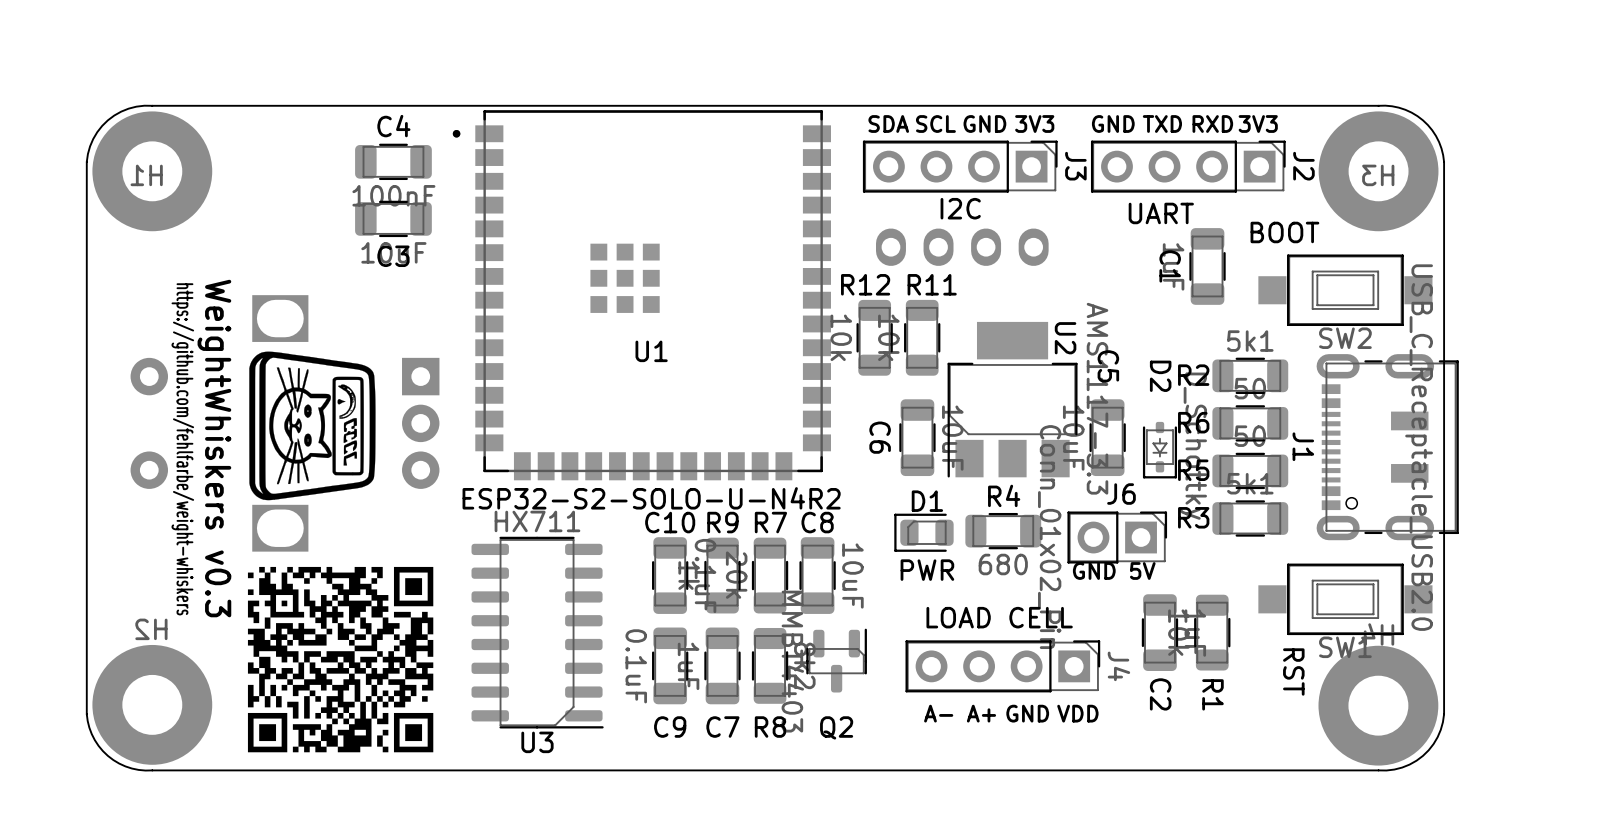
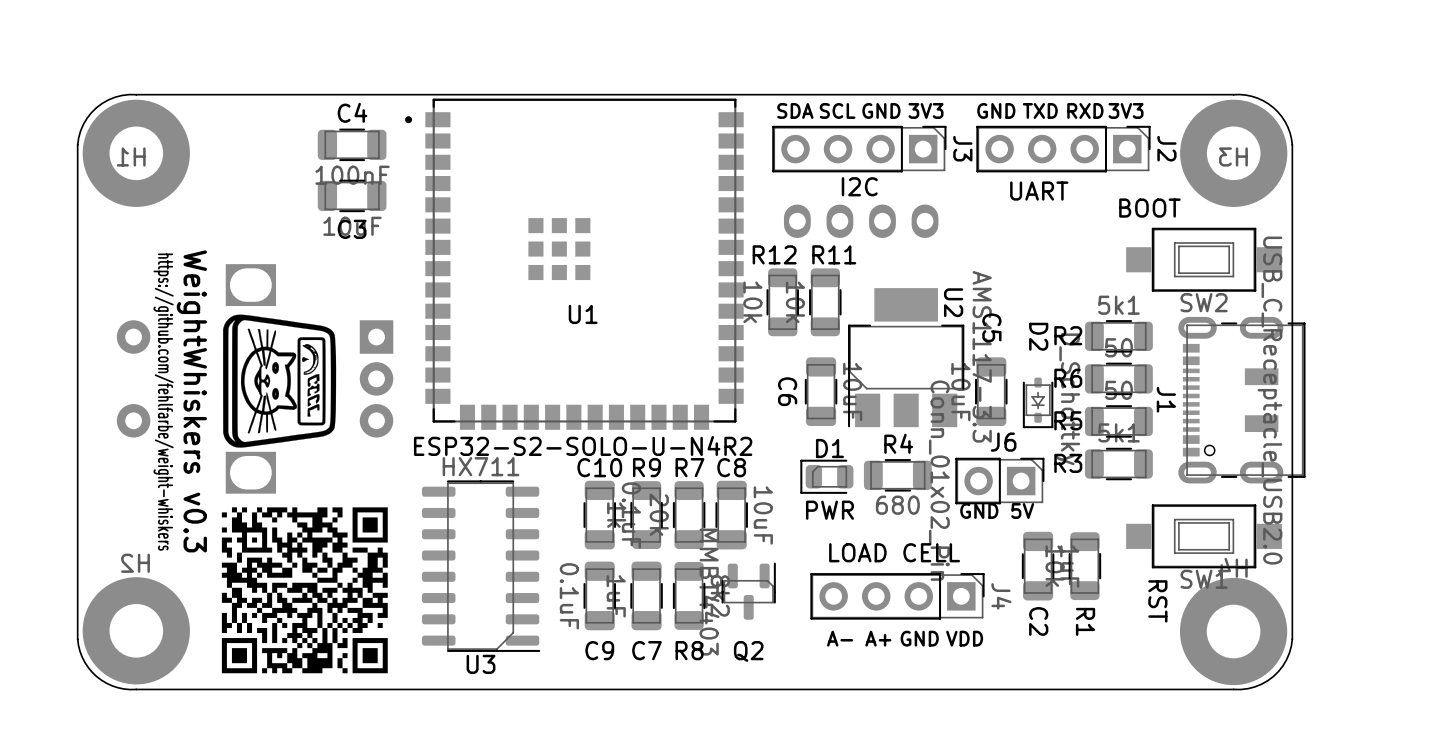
C1: 1uF (1207, 266) -> none

